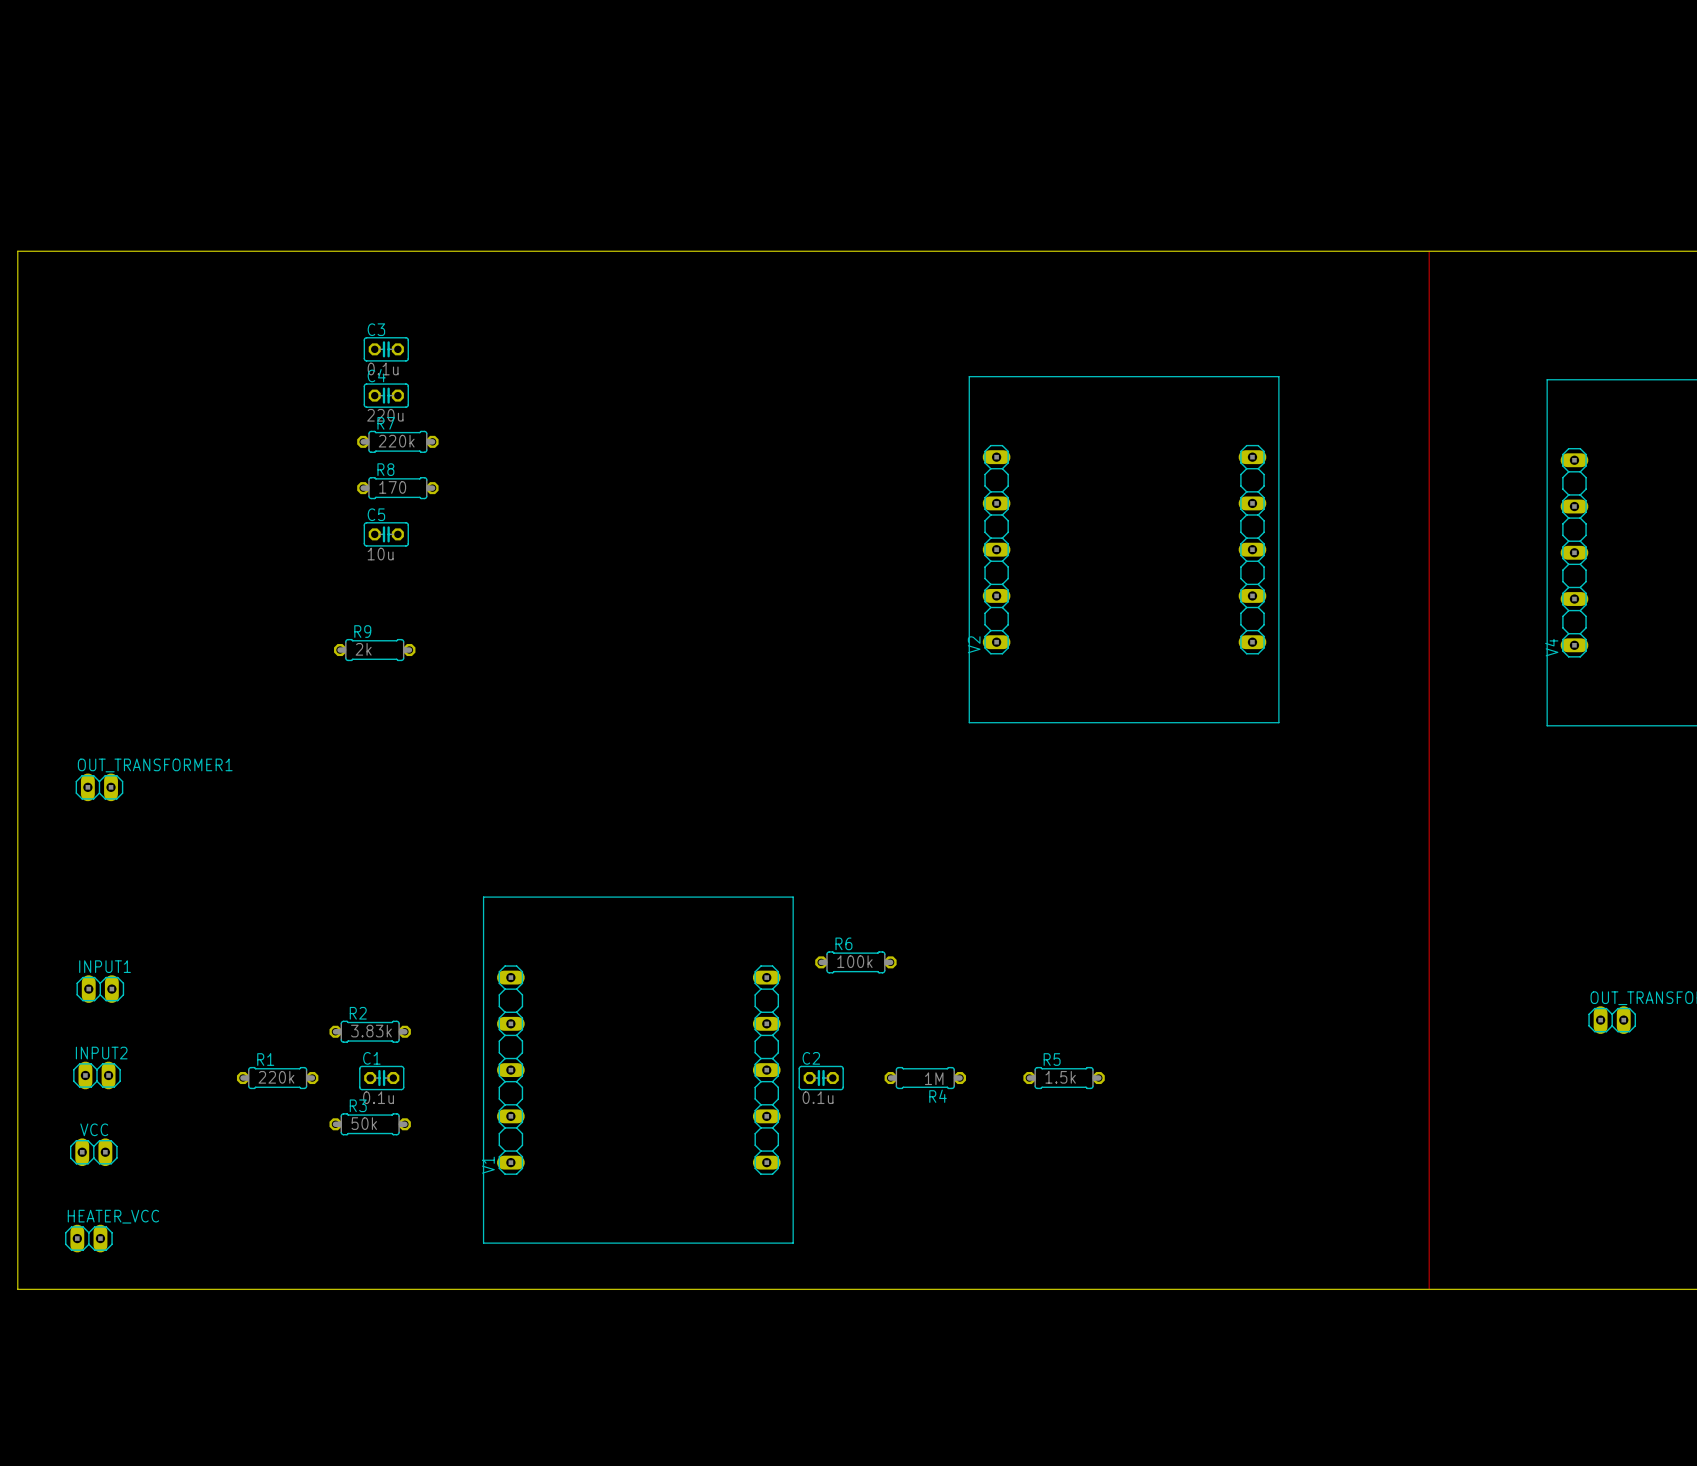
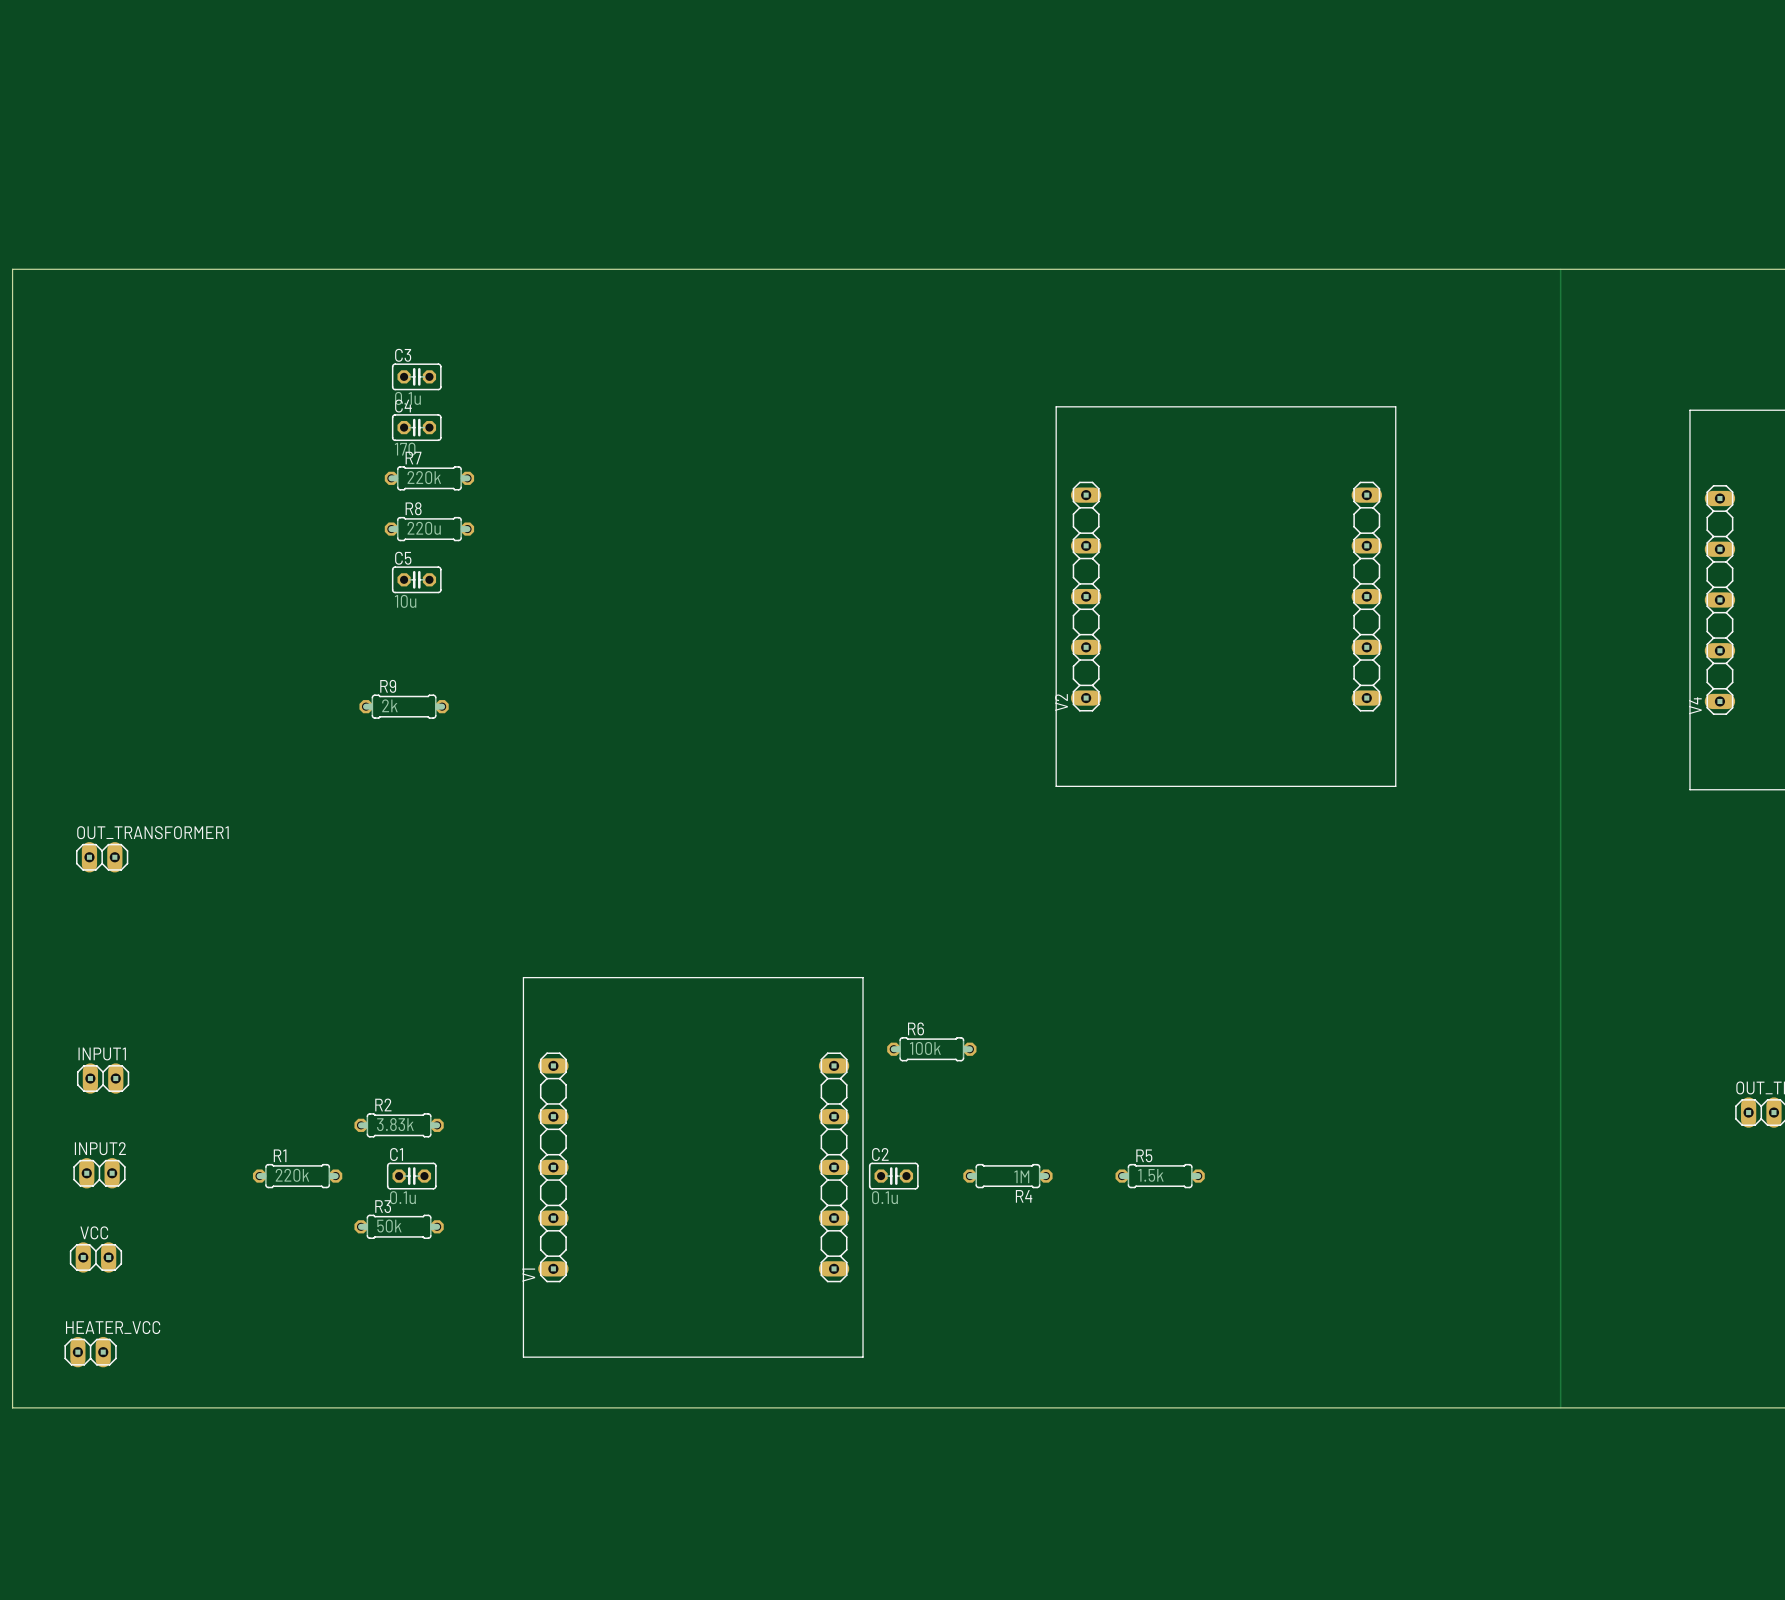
C4 value: 220u (385, 415) -> 170 (405, 449)
R8 value: 170 (392, 487) -> 220u (424, 528)

